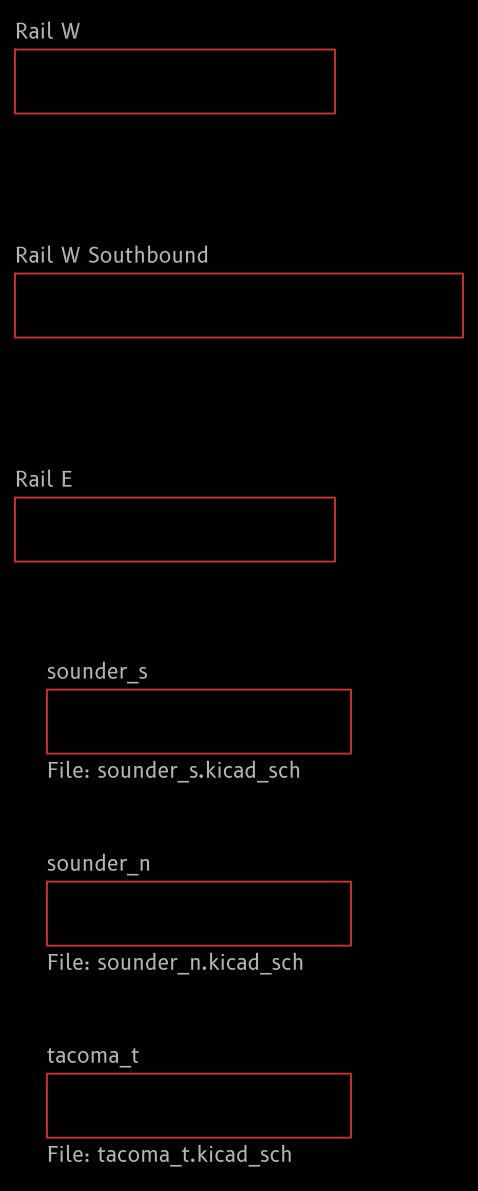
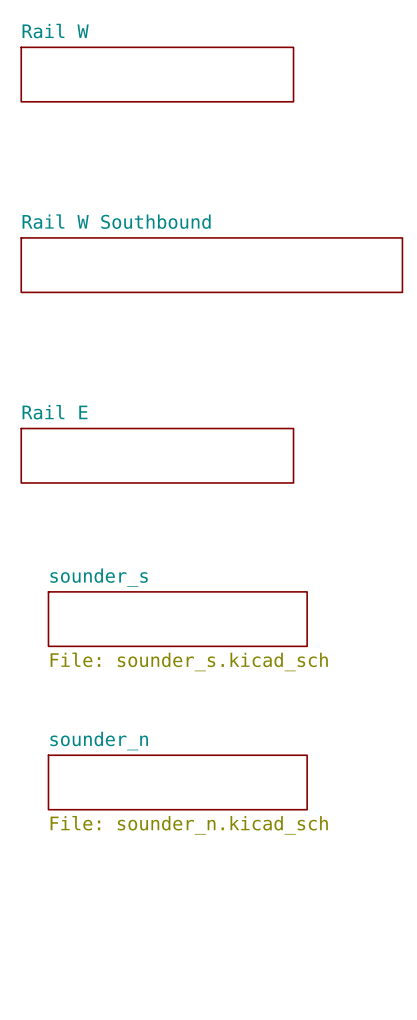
sheet tacoma_t: File: tacoma_t.kicad_sch (198, 1105) -> none

